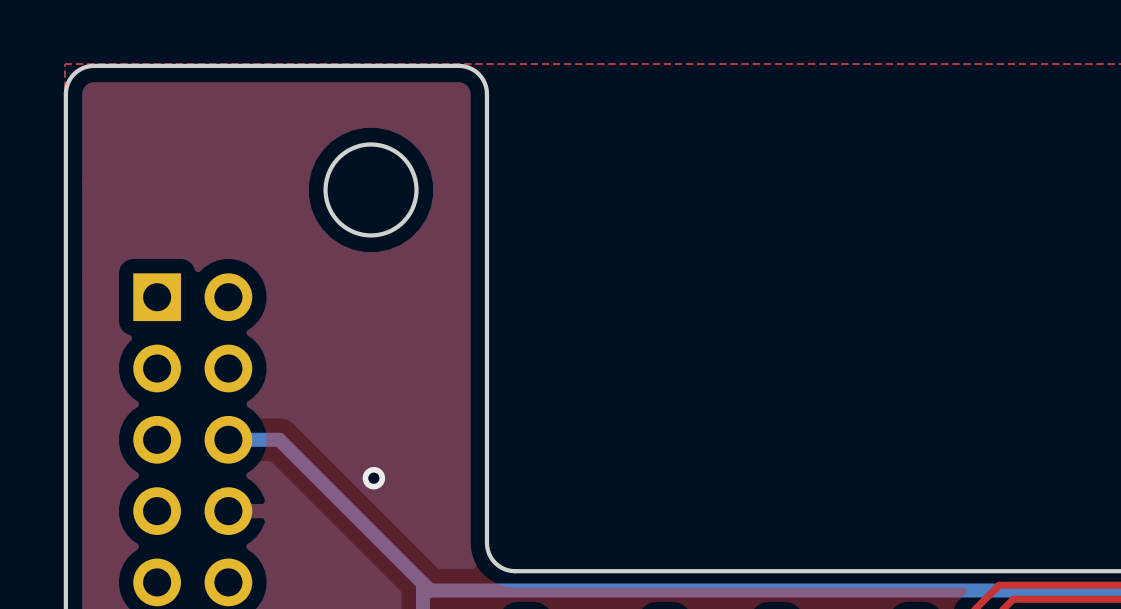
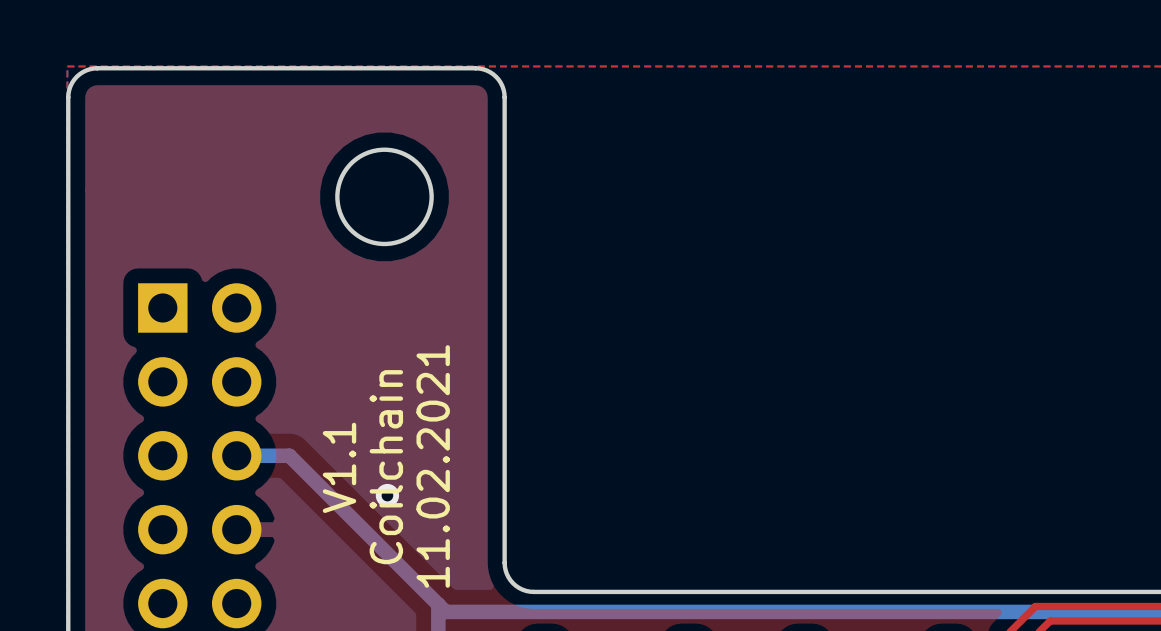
text: none -> Coilchain (386, 467)
text: none -> 11.02.2021 (433, 466)
text: none -> V1.1 (339, 467)

